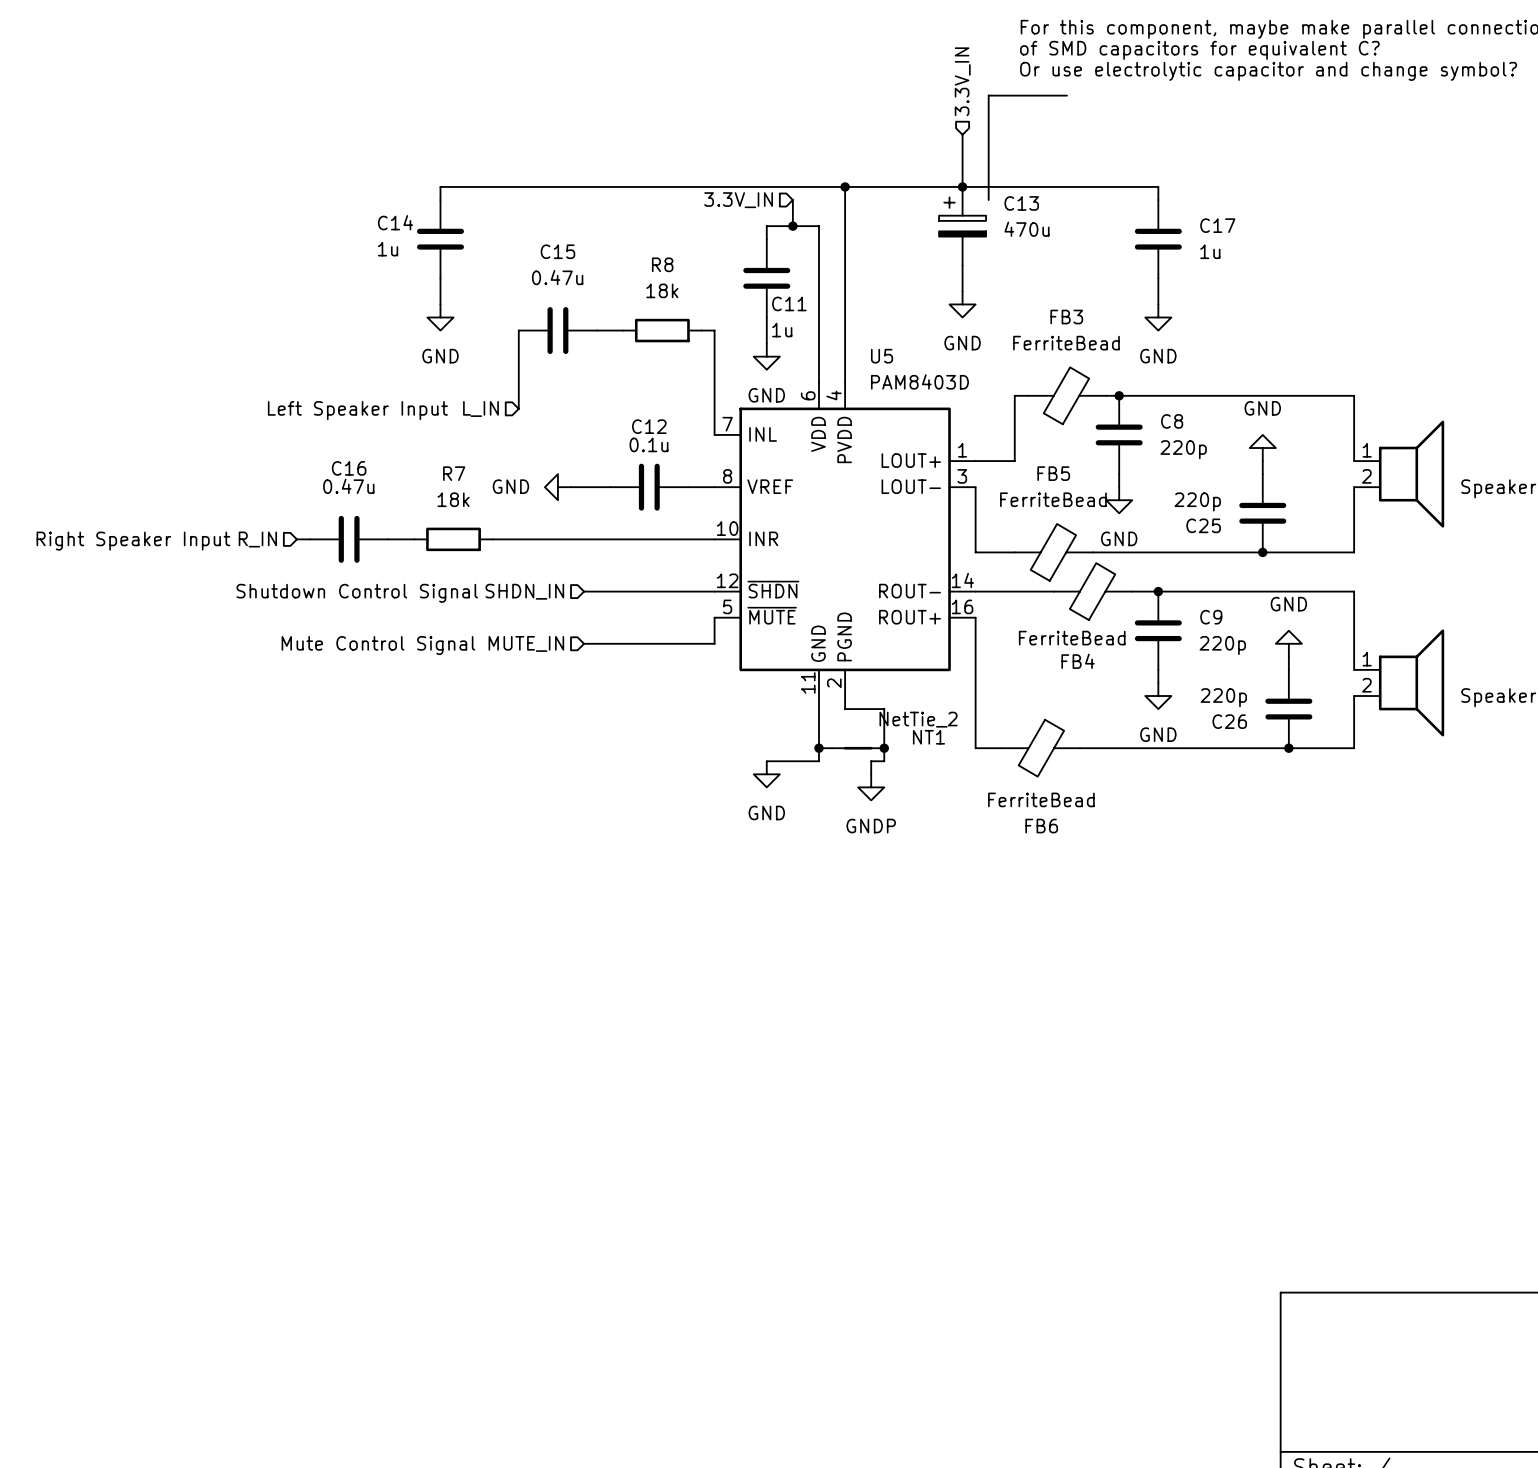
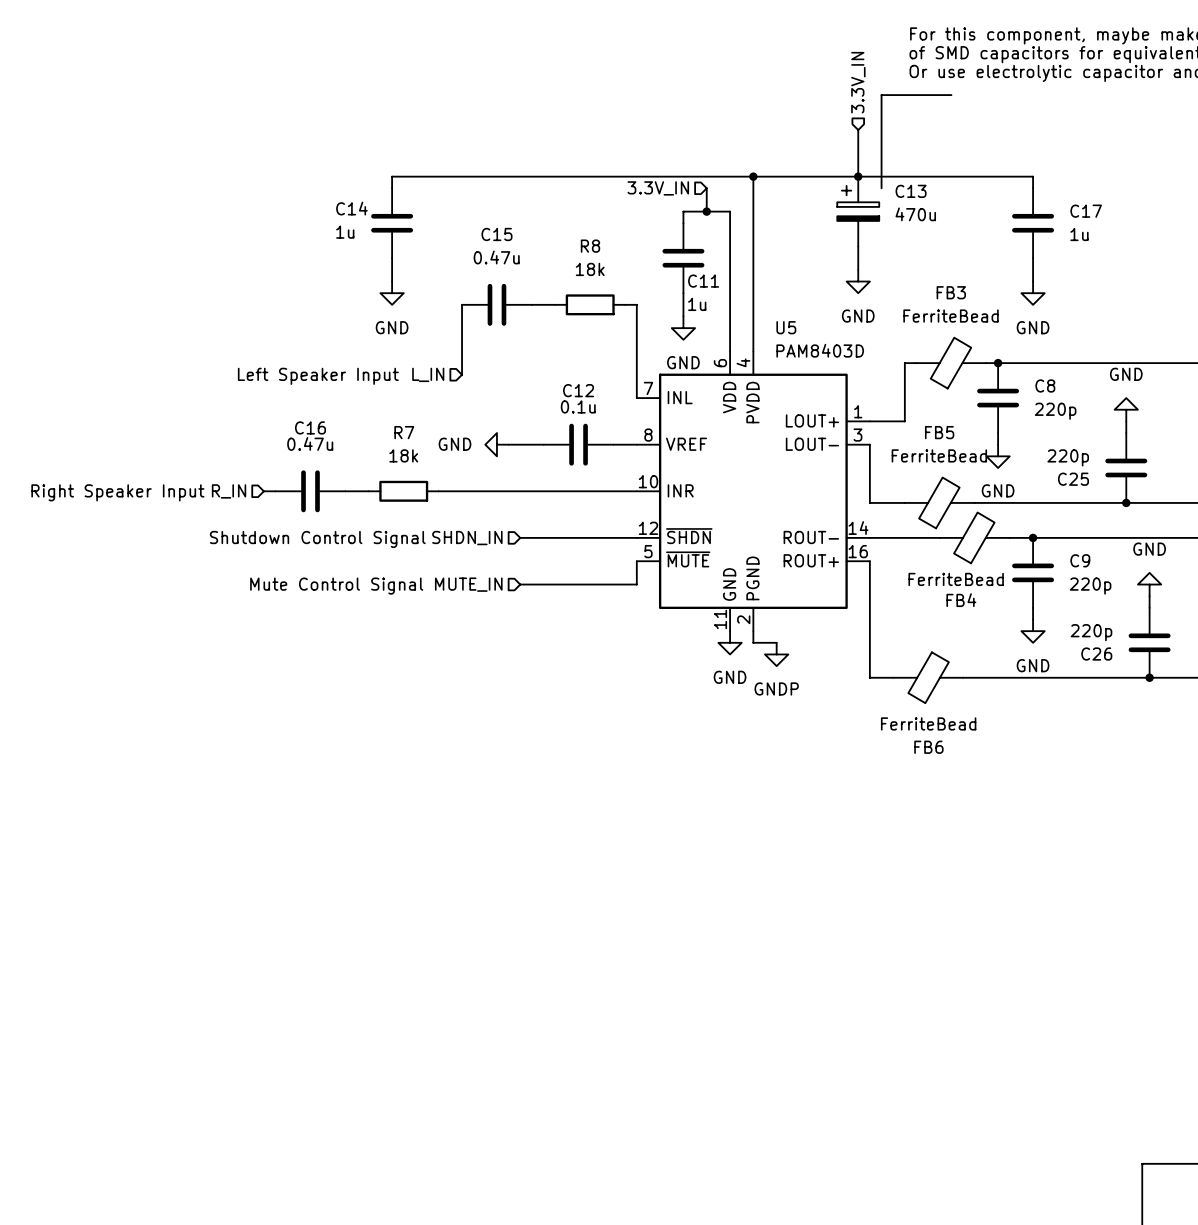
wire: (818, 696) (818, 761) (766, 761) -> none
wire: (871, 709) (884, 709) (884, 761) (871, 761) (871, 774) -> none
wire: (818, 748) (832, 748) -> none
junction: (818, 748) -> none
NT1: NetTie_2 (858, 748) -> none
junction: (884, 748) -> none
power symbol position: GND (766, 774) -> GND (730, 642)
power symbol position: GNDP (871, 787) -> GNDP (776, 654)

